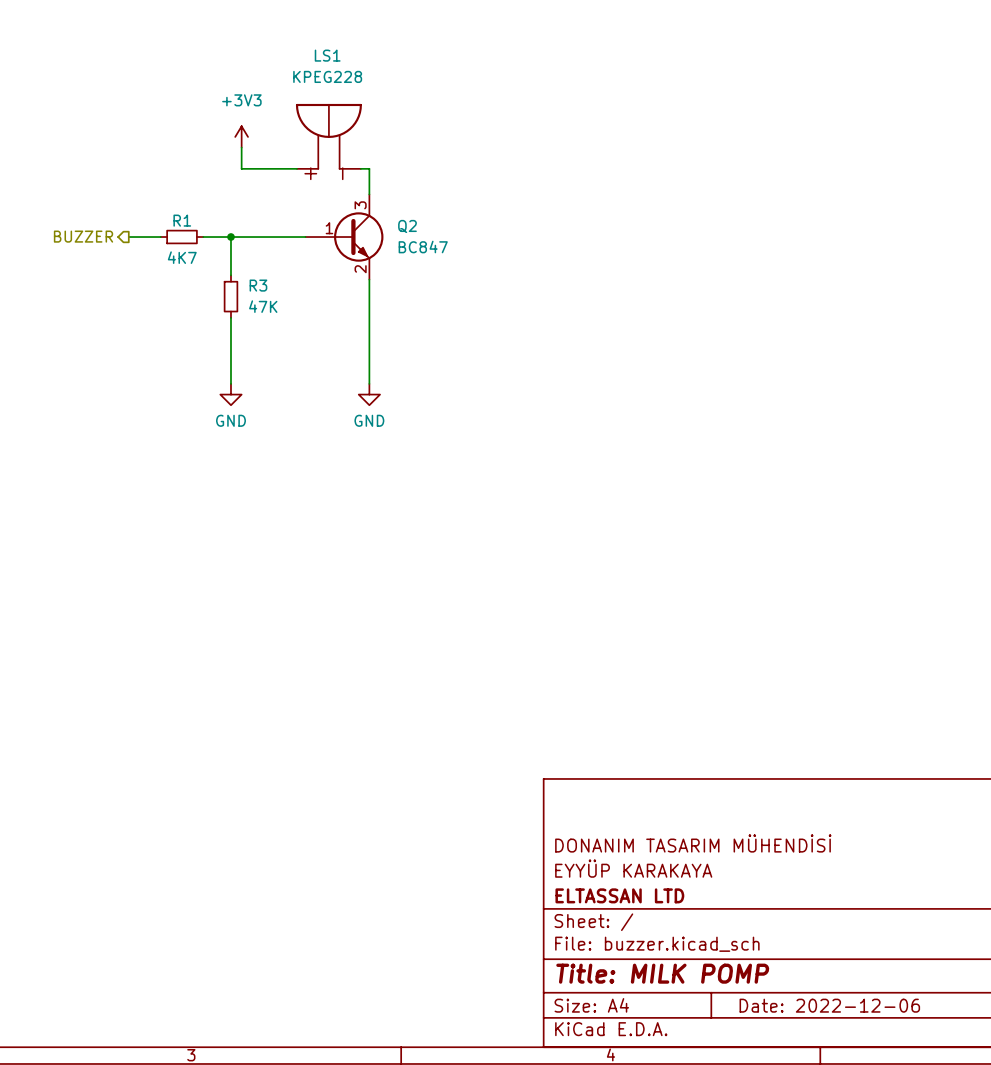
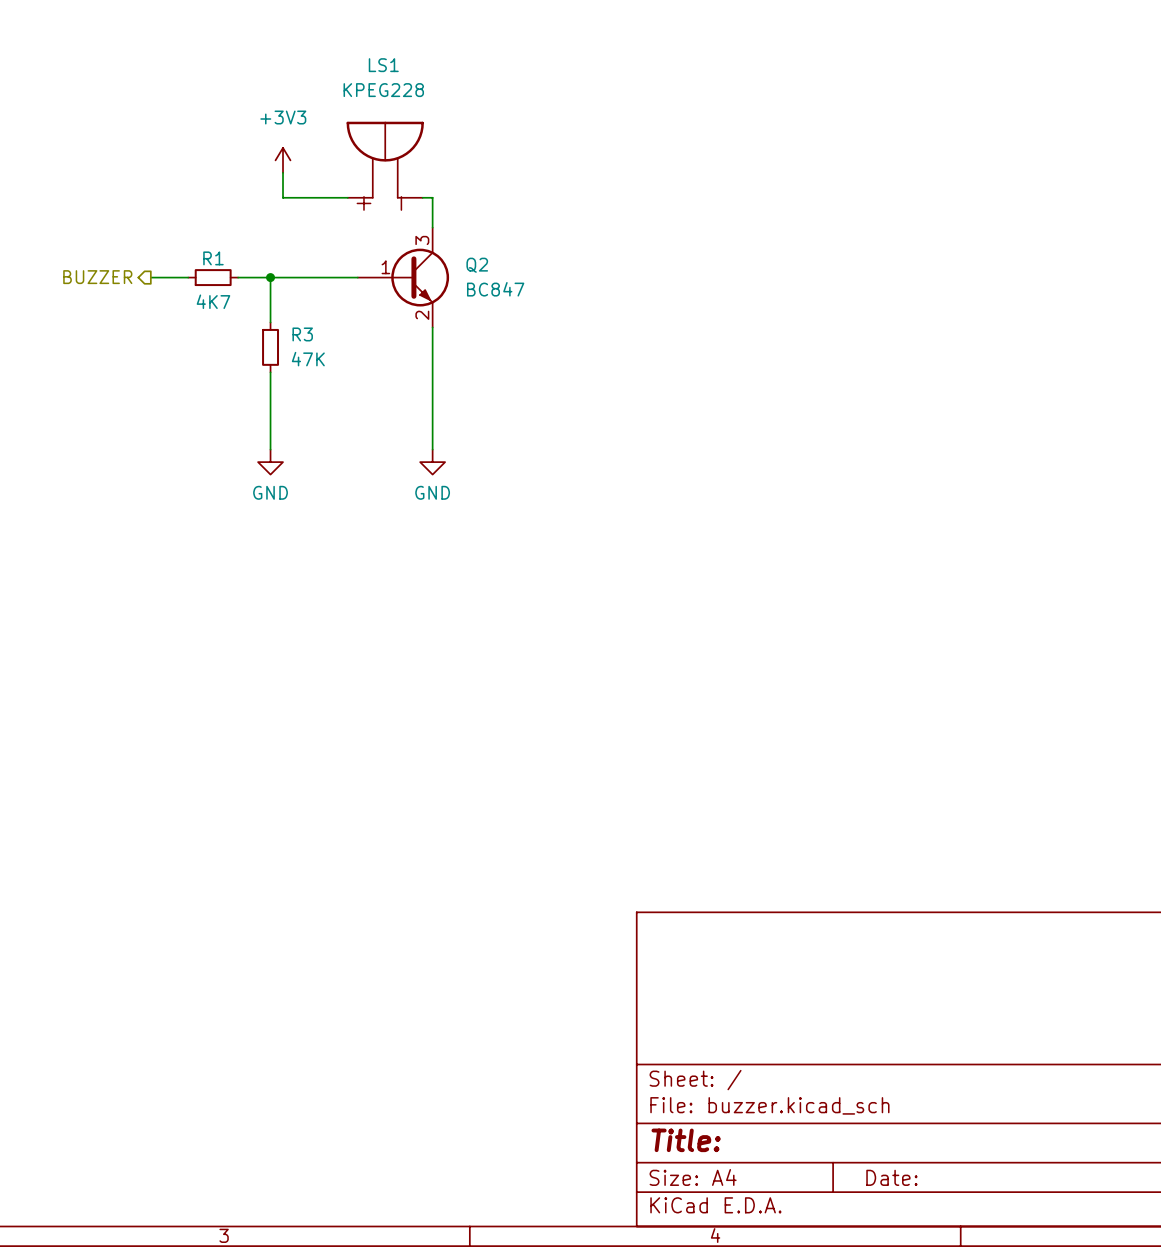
title block: DONANIM TASARIM MÜHENDİSİ (693, 843) -> none
title block: EYYÜP KARAKAYA (633, 868) -> none
title block: ELTASSAN LTD (619, 895) -> none
title block: Title: MILK POMP (662, 973) -> Title: (686, 1140)
title block: Date: 2022-12-06 (829, 1005) -> Date: (891, 1177)

